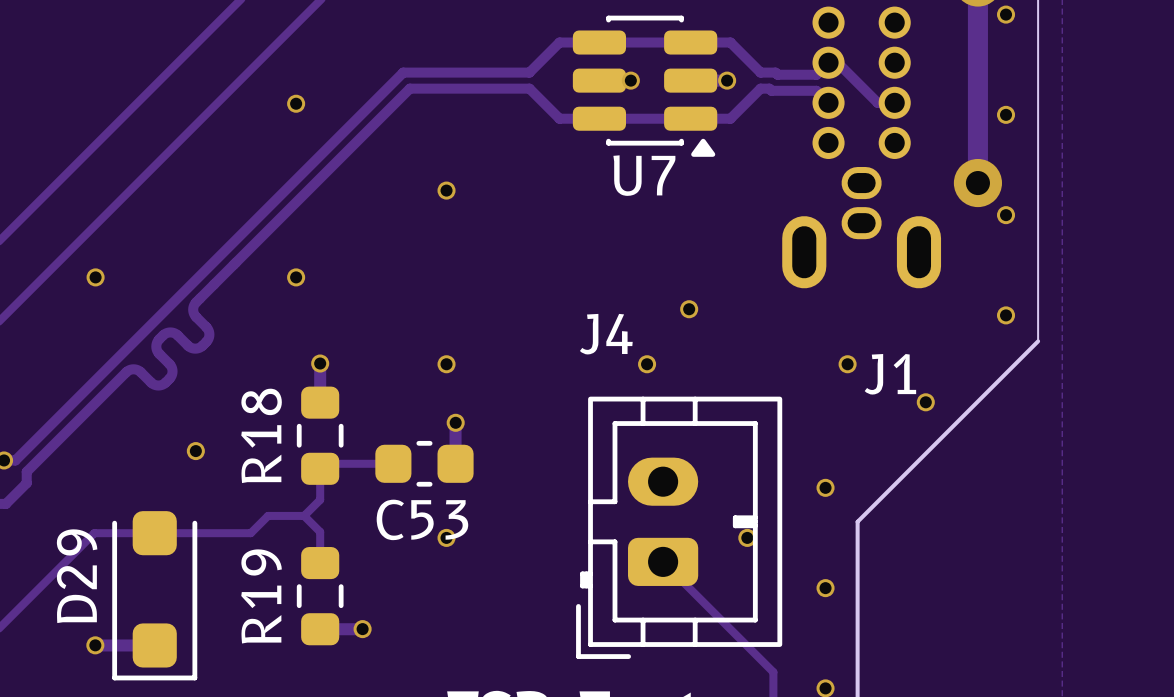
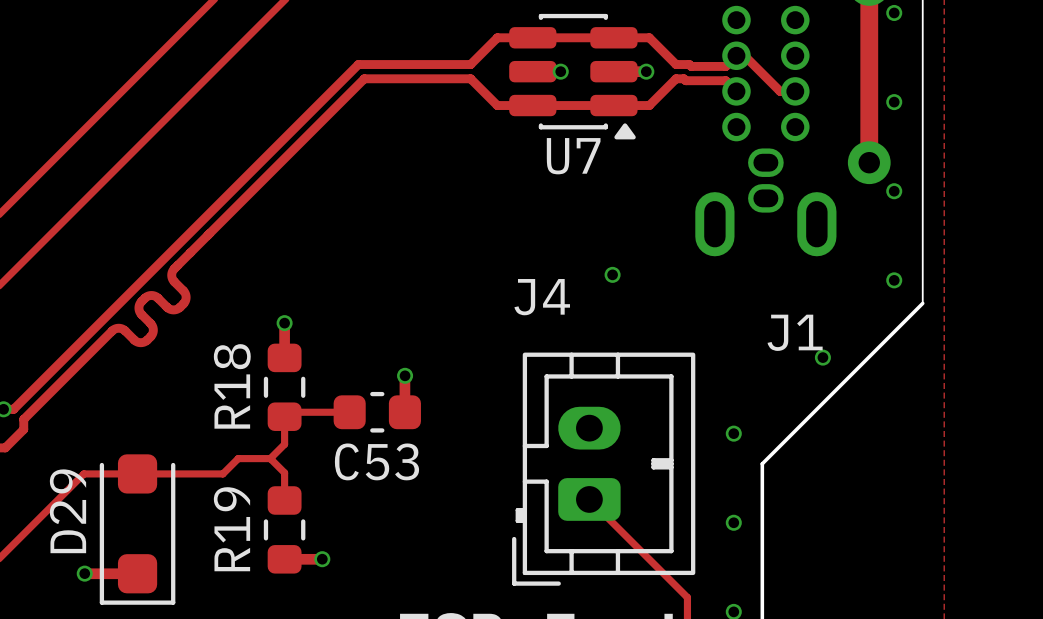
via: (296, 103) -> none
via: (446, 190) -> none
via: (95, 277) -> none
via: (296, 277) -> none
via: (446, 364) -> none
via: (647, 364) -> none
via: (847, 364) -> none
via: (195, 451) -> none
via: (446, 537) -> none
via: (747, 537) -> none

